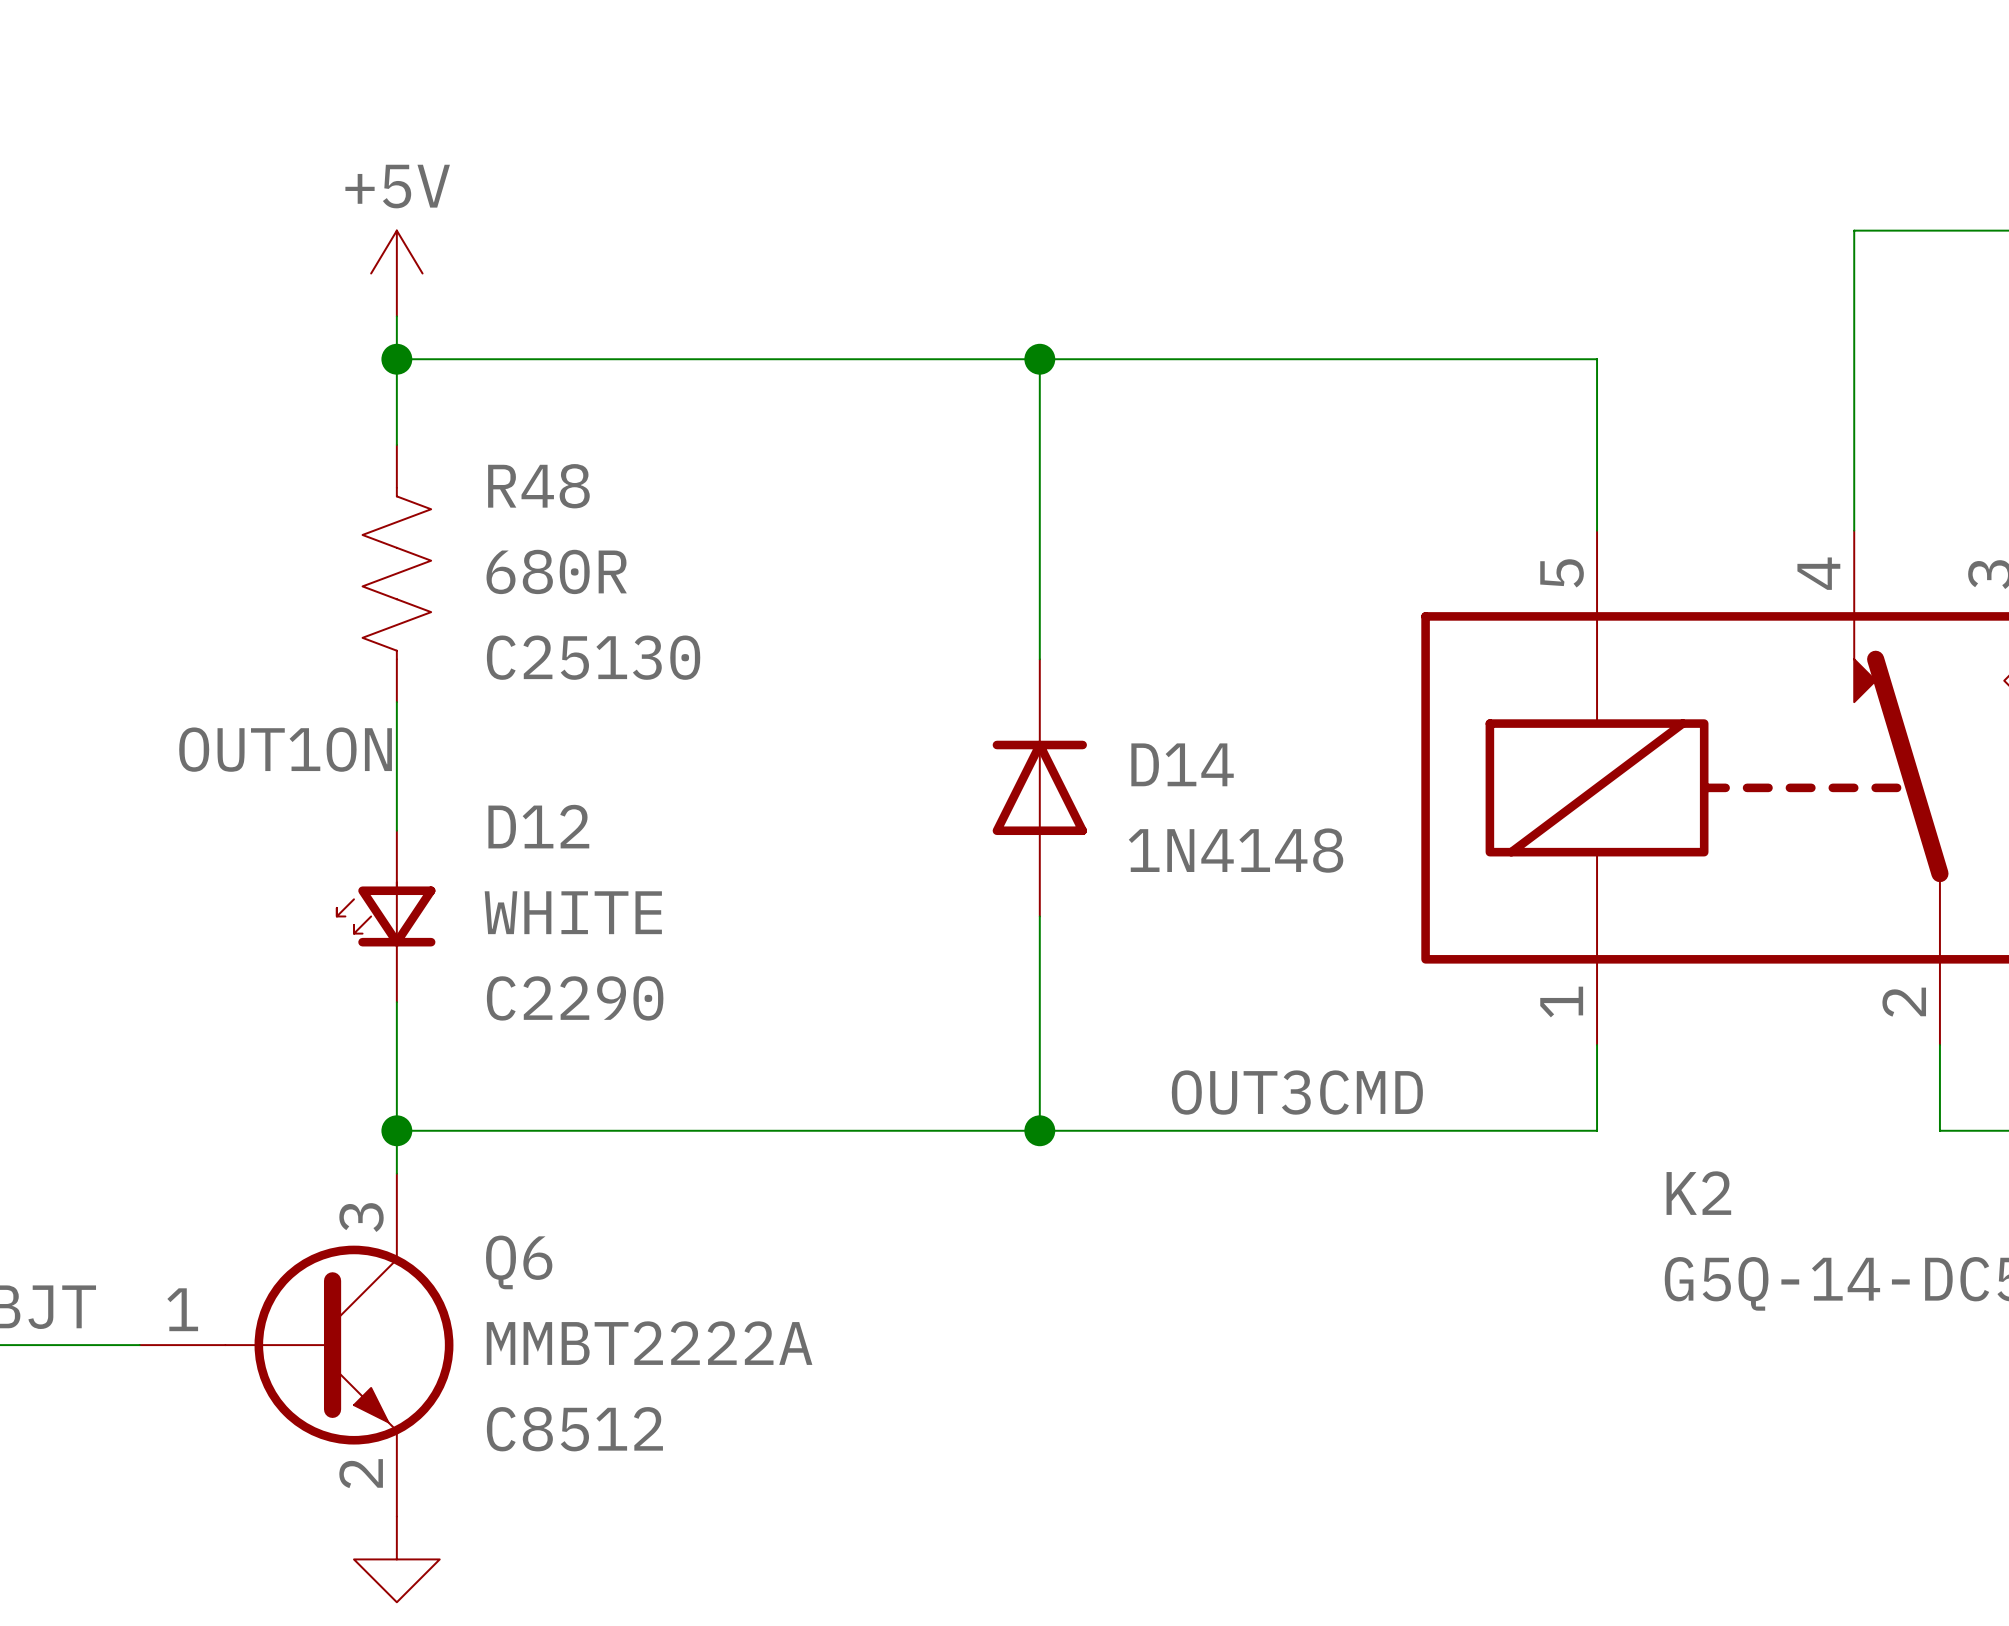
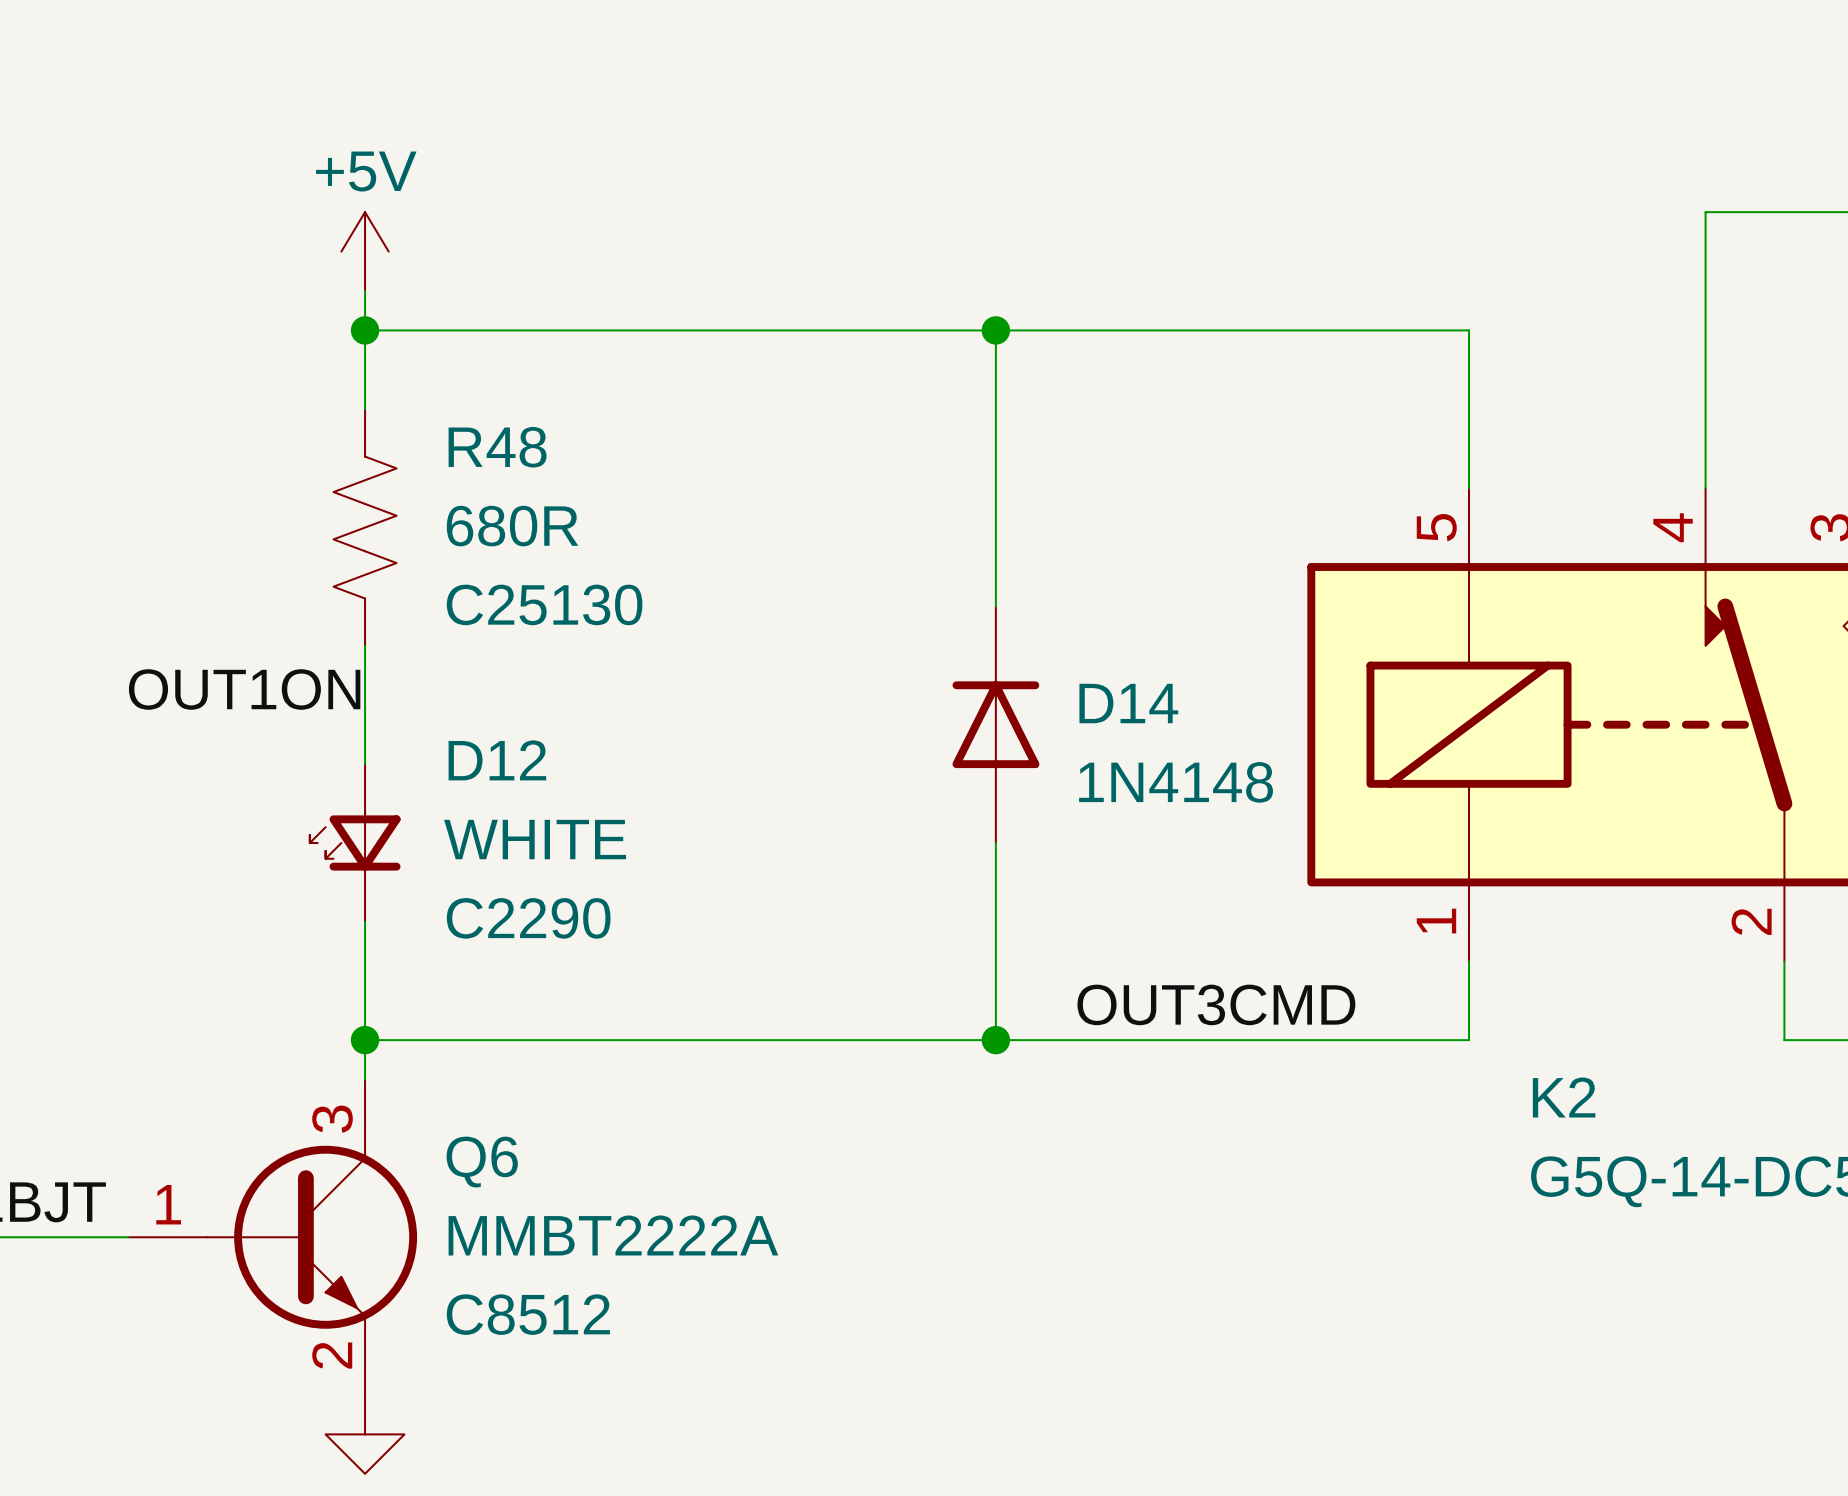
wire: (1039, 359) (1039, 659) -> (995, 330) (995, 606)
junction position: (1039, 359) -> (995, 330)
D14 position: (1039, 787) -> (995, 724)
wire: (1039, 916) (1039, 1130) -> (995, 842) (995, 1040)
junction position: (1039, 1130) -> (995, 1040)

